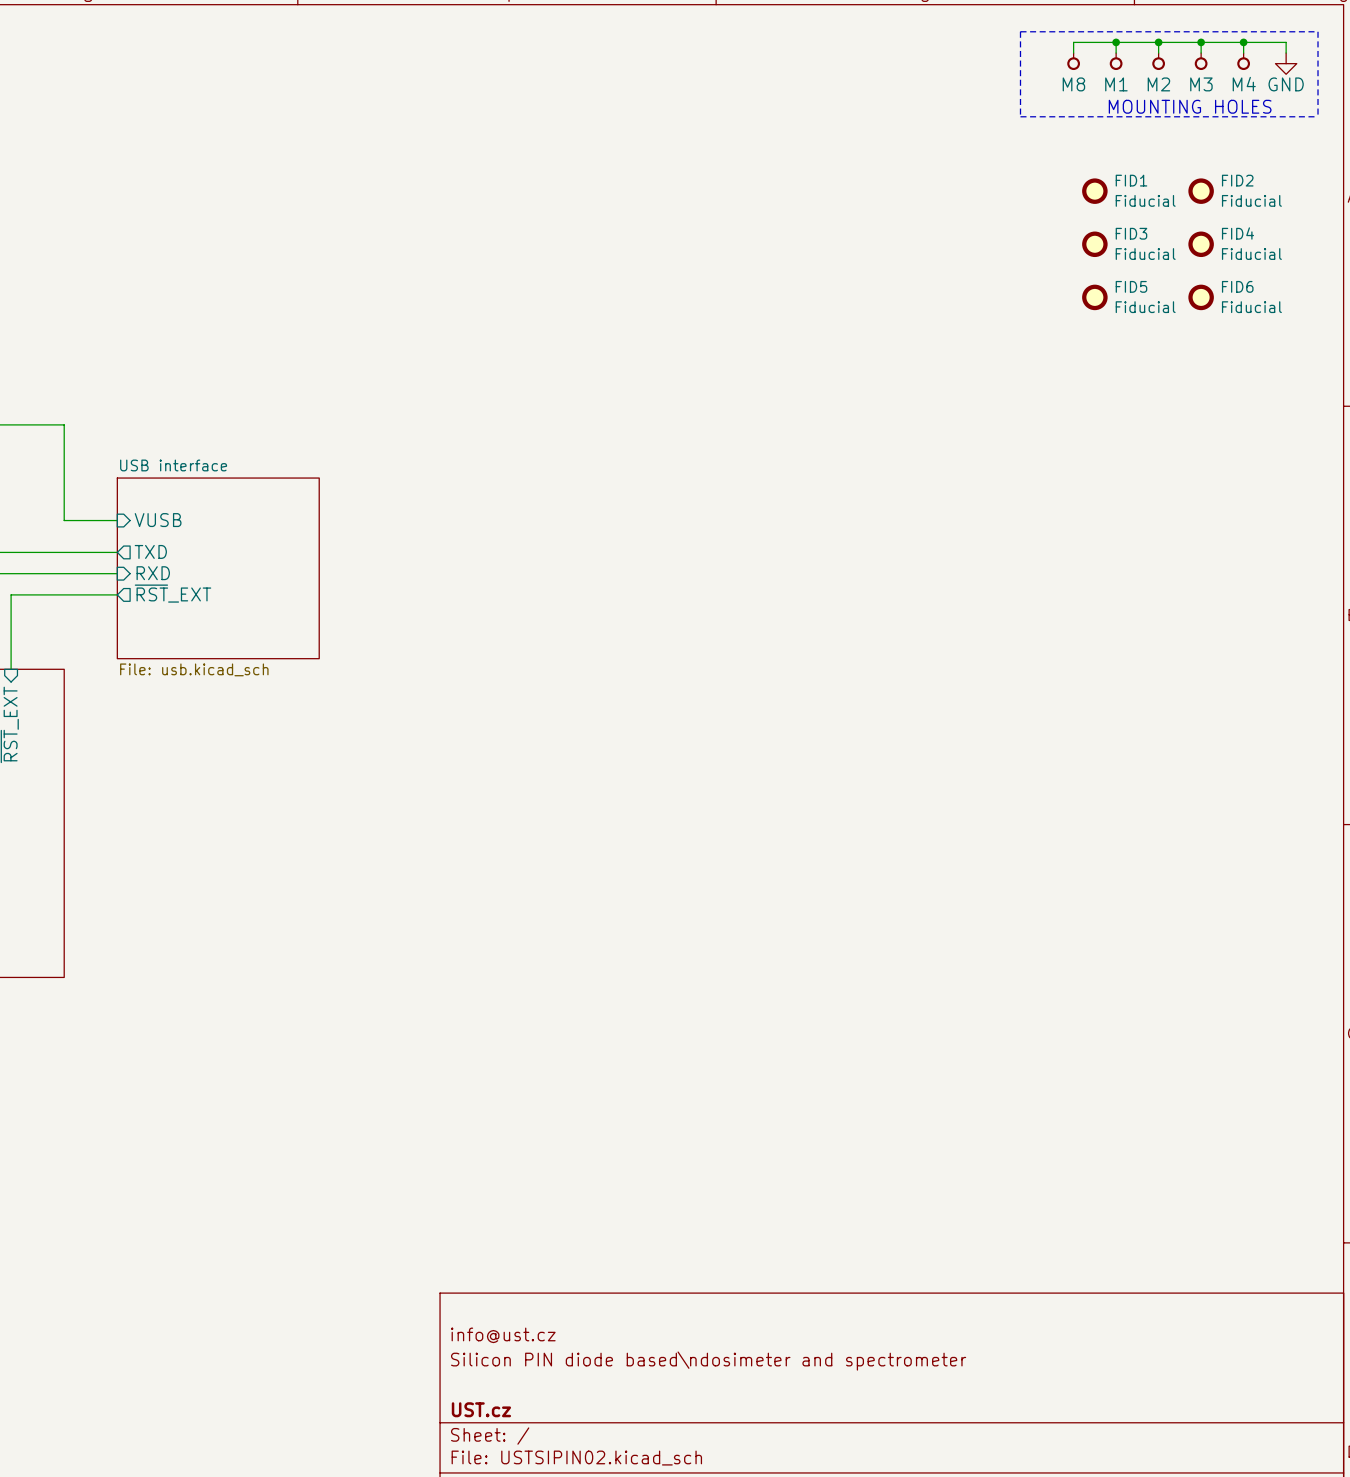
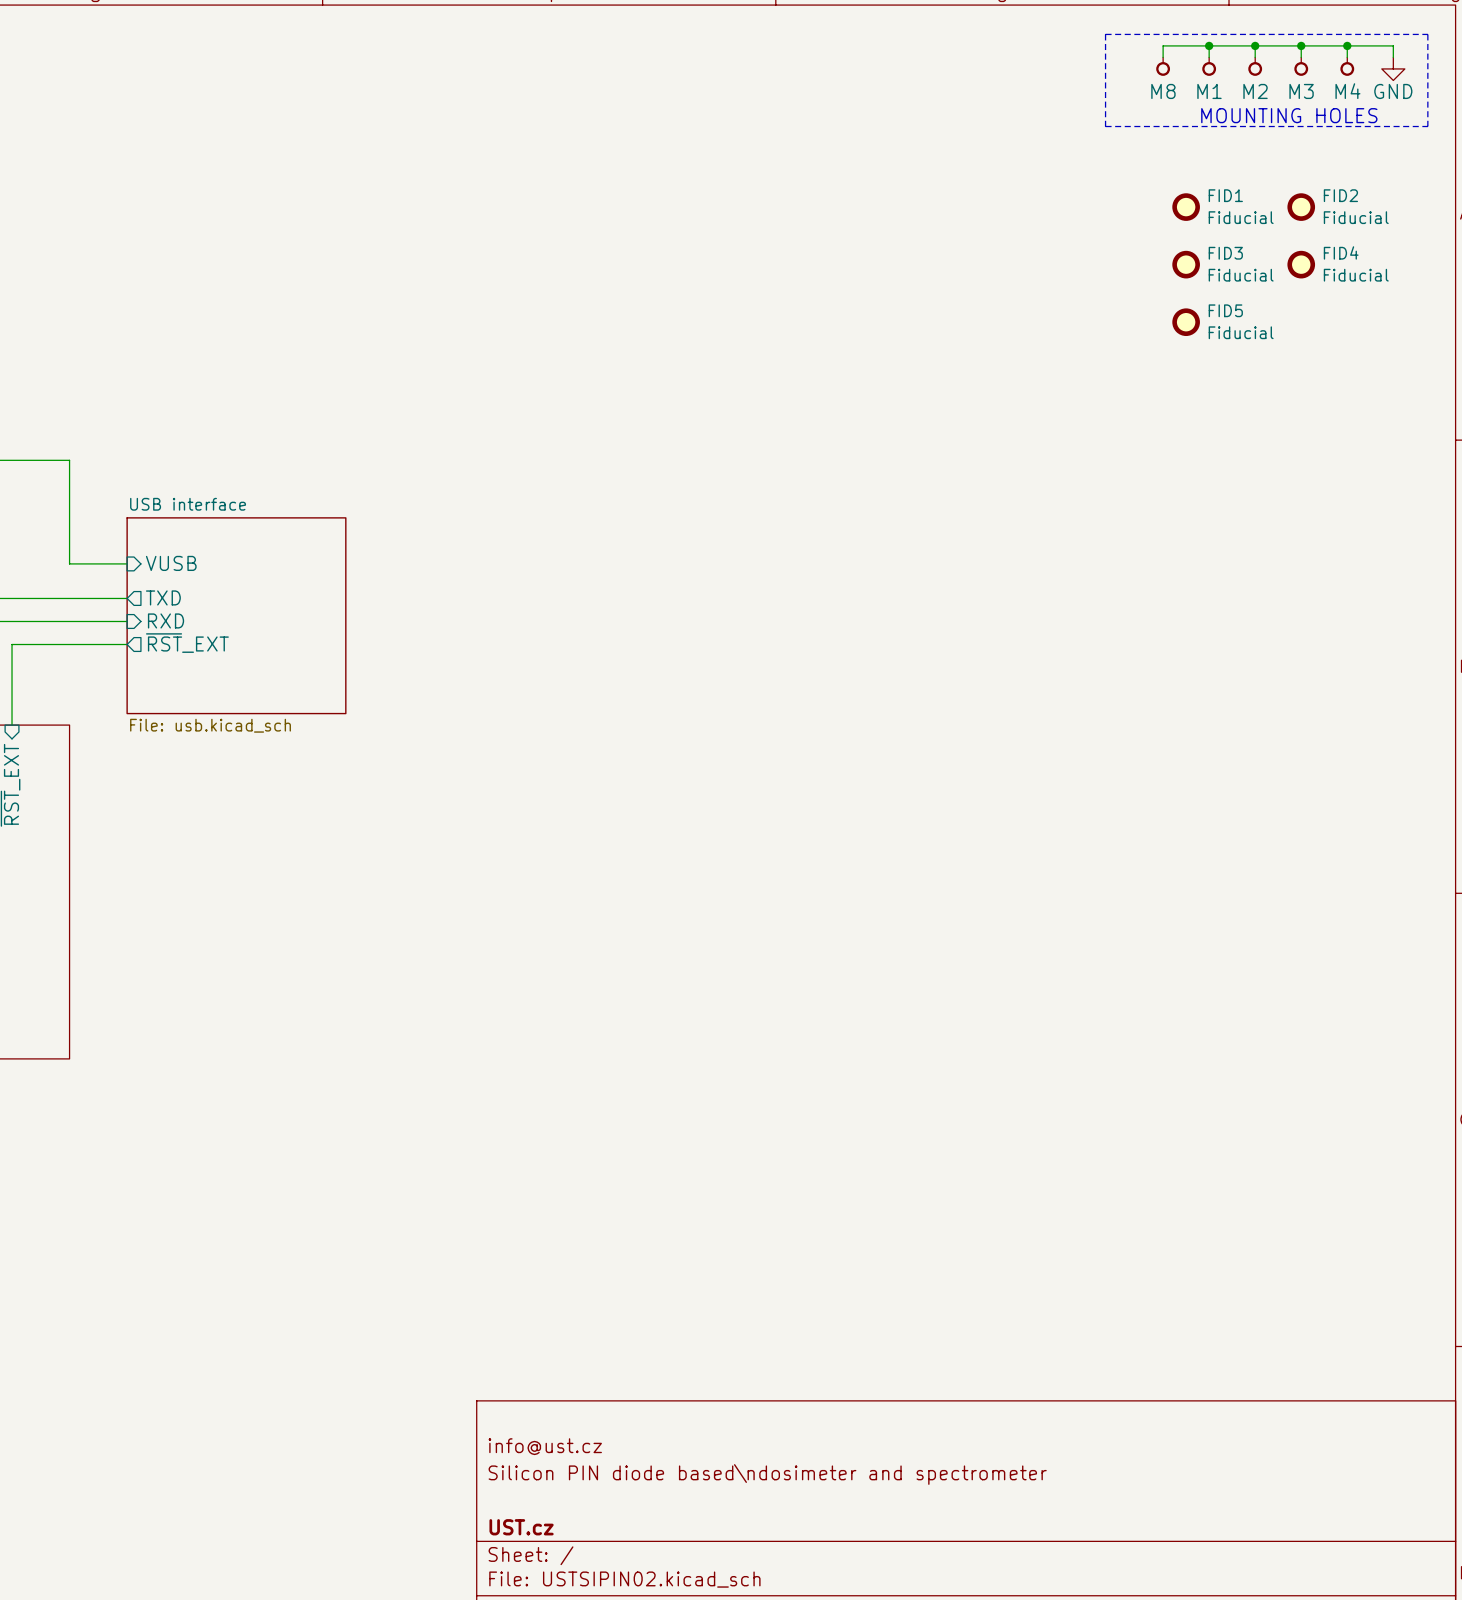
FID6: Fiducial (1201, 297) -> none

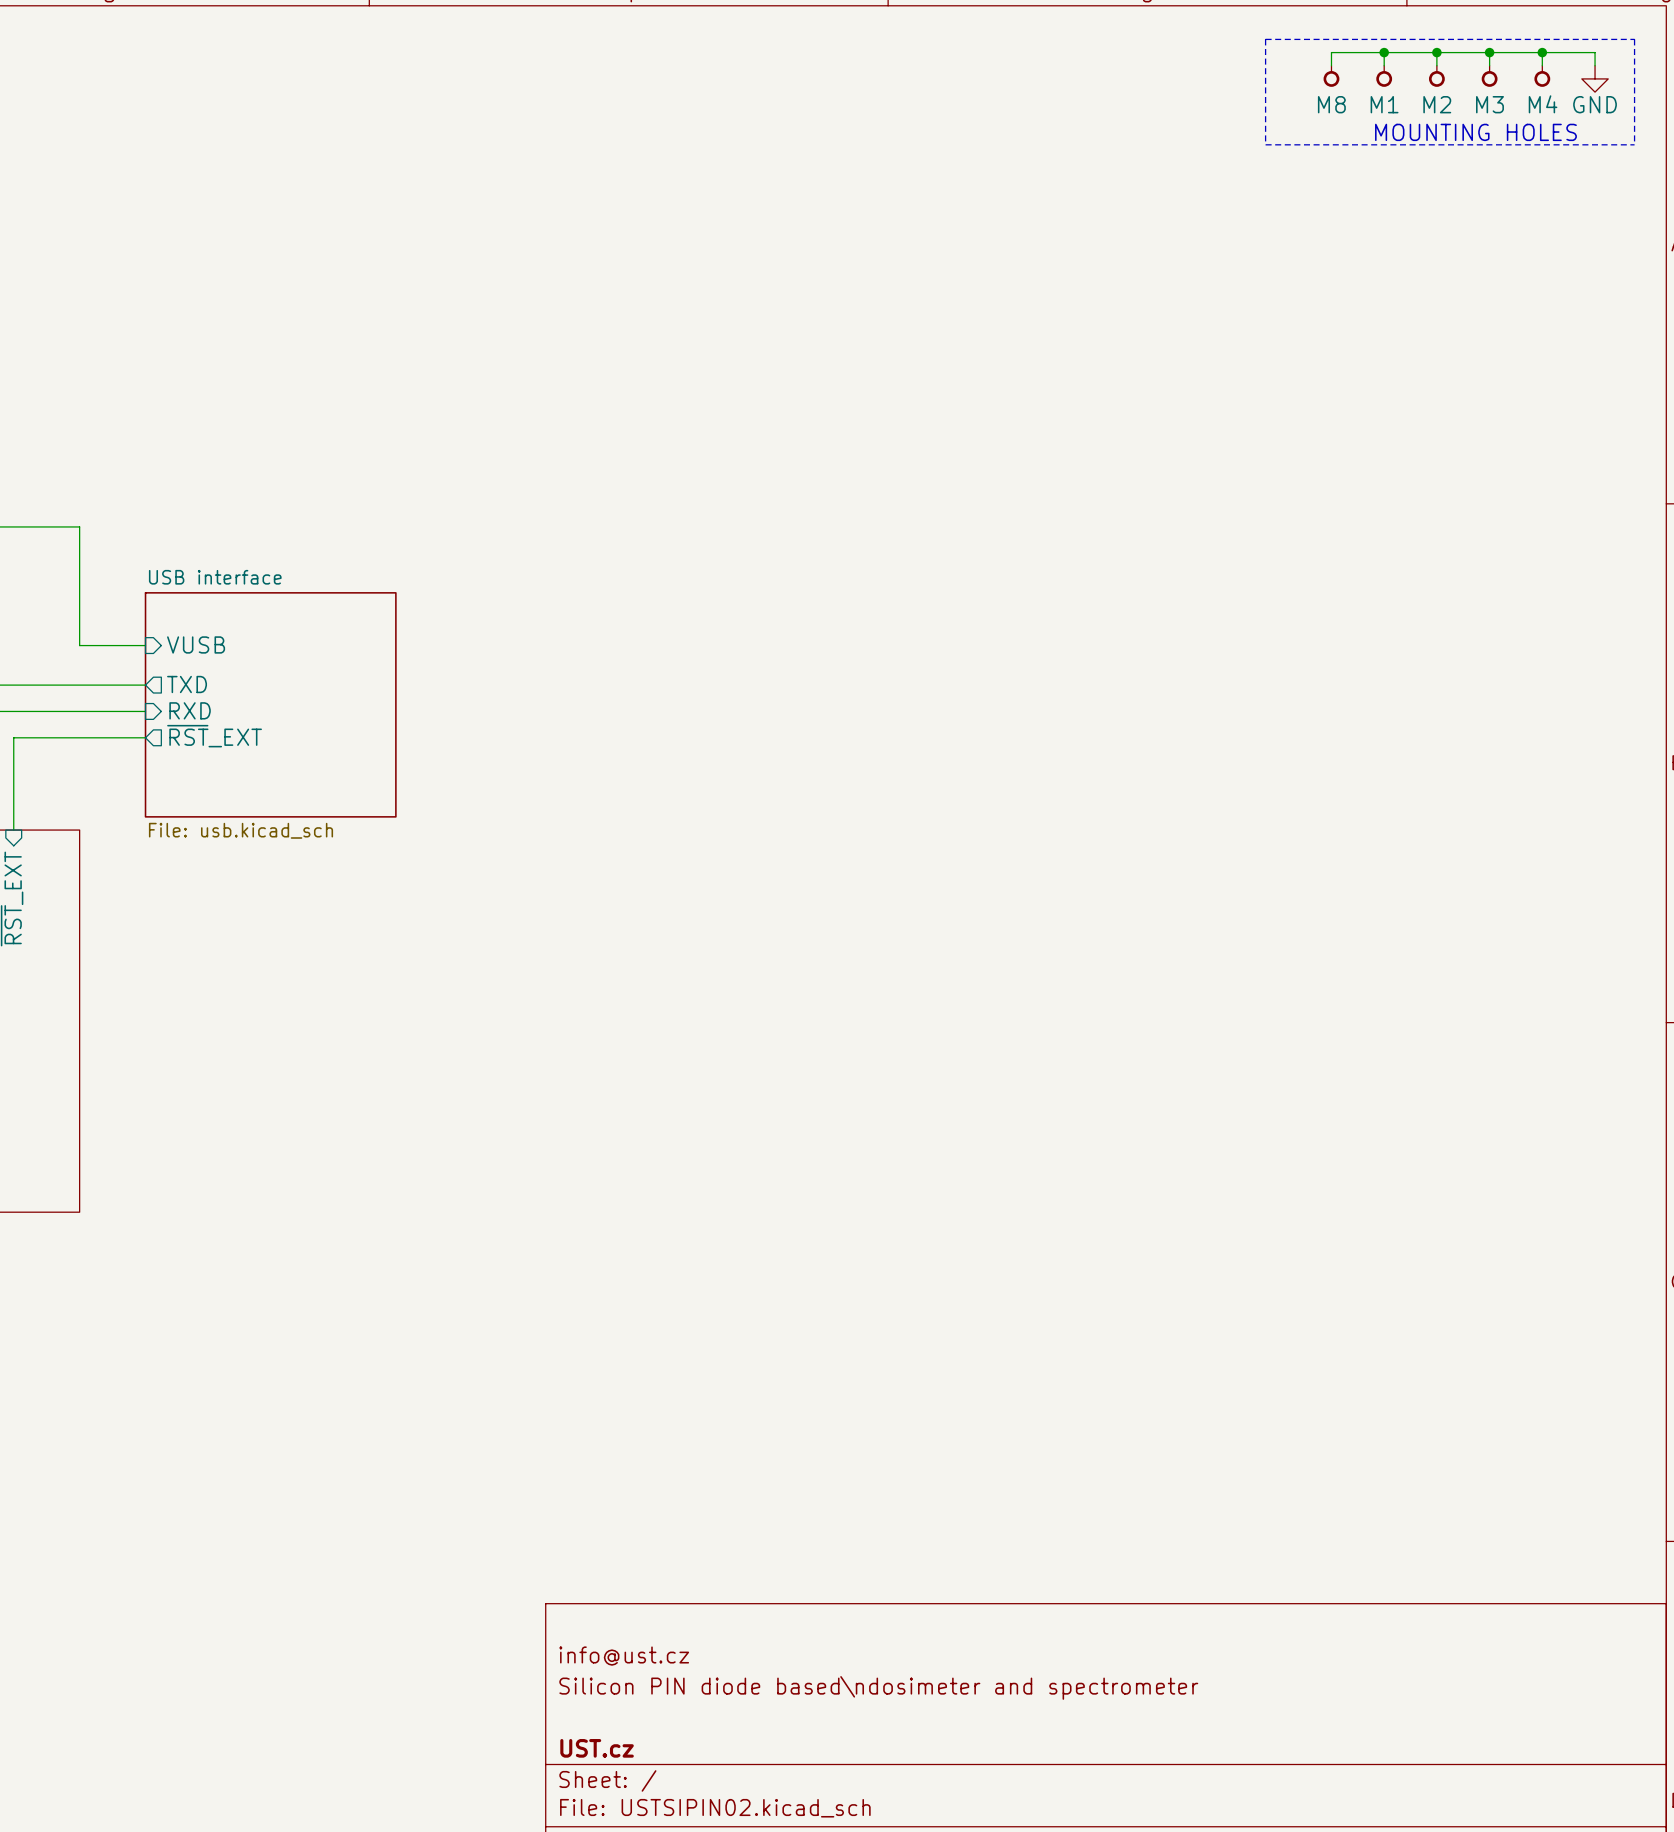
FID1: Fiducial (1186, 207) -> none
FID2: Fiducial (1301, 207) -> none
FID3: Fiducial (1186, 264) -> none
FID4: Fiducial (1301, 264) -> none
FID5: Fiducial (1186, 322) -> none

